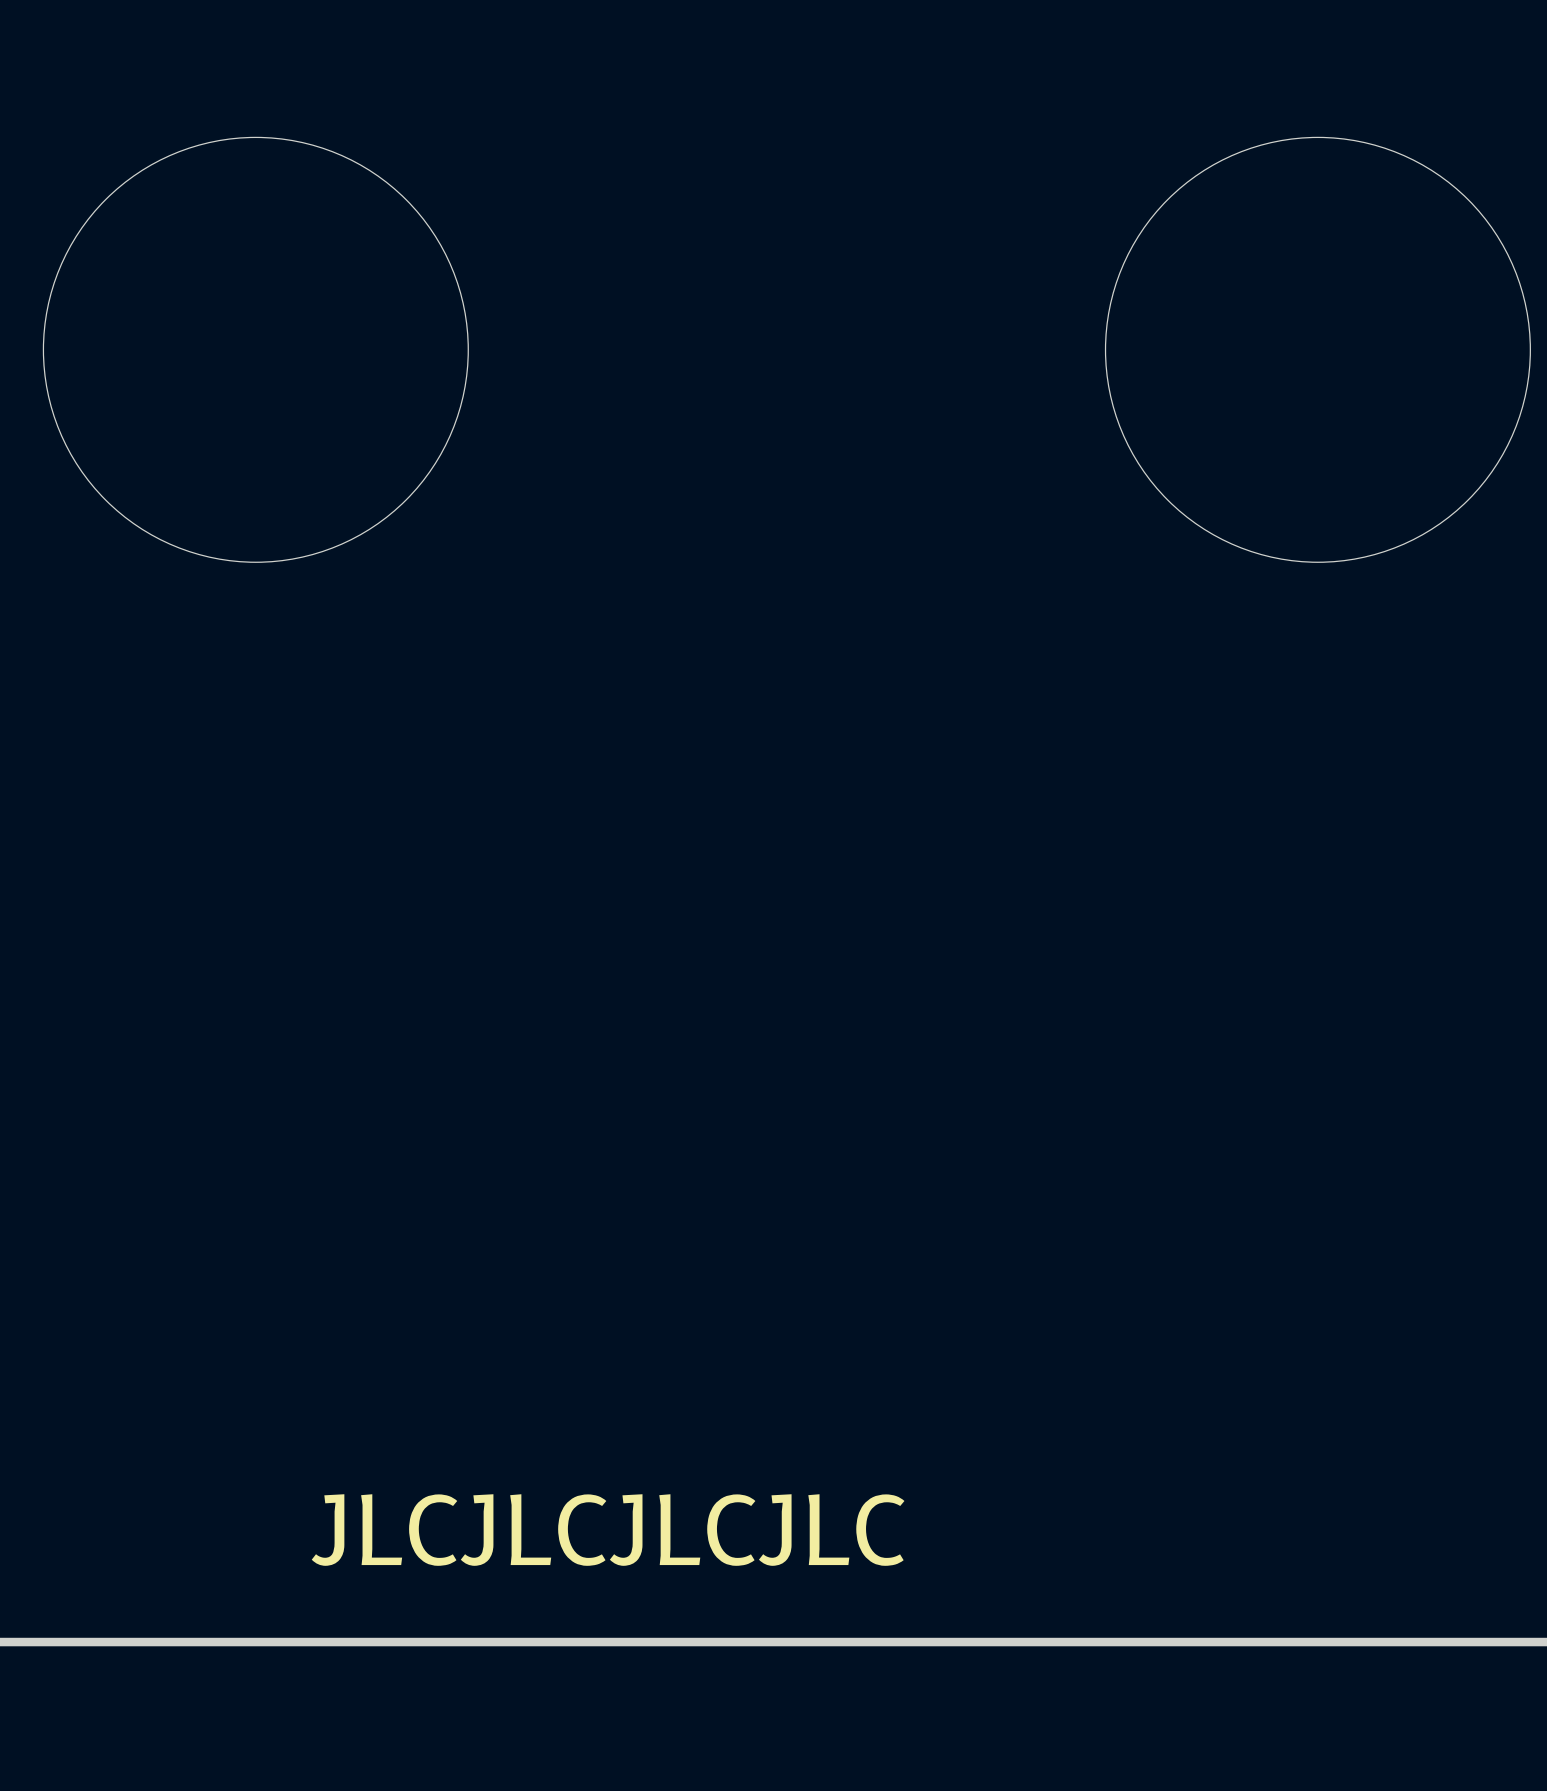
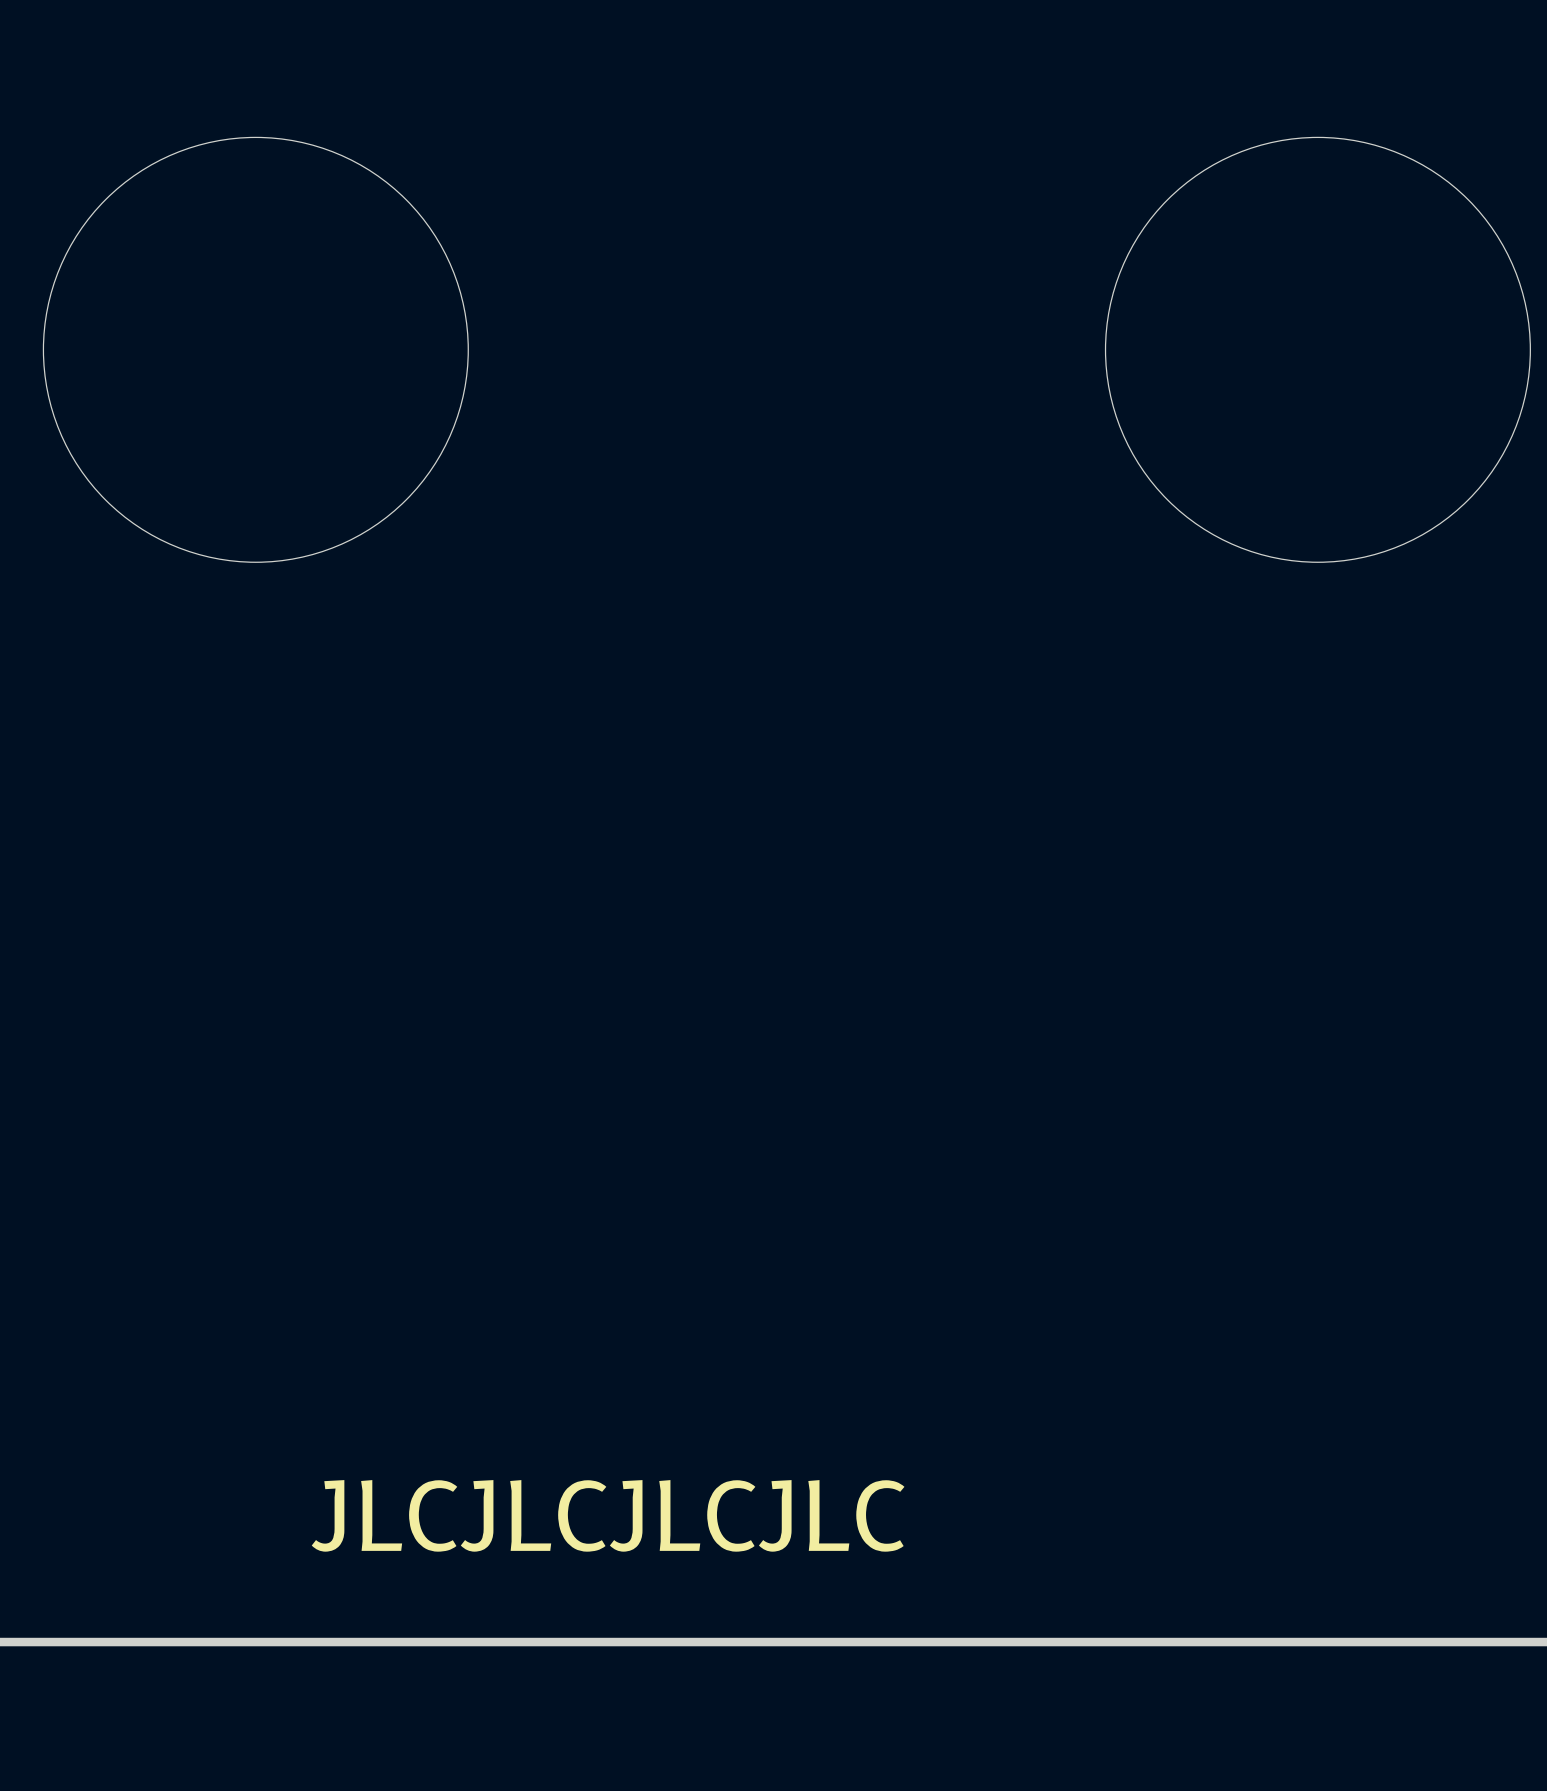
text position: JLCJLCJLCJLC (608, 1530) -> JLCJLCJLCJLC (608, 1515)

